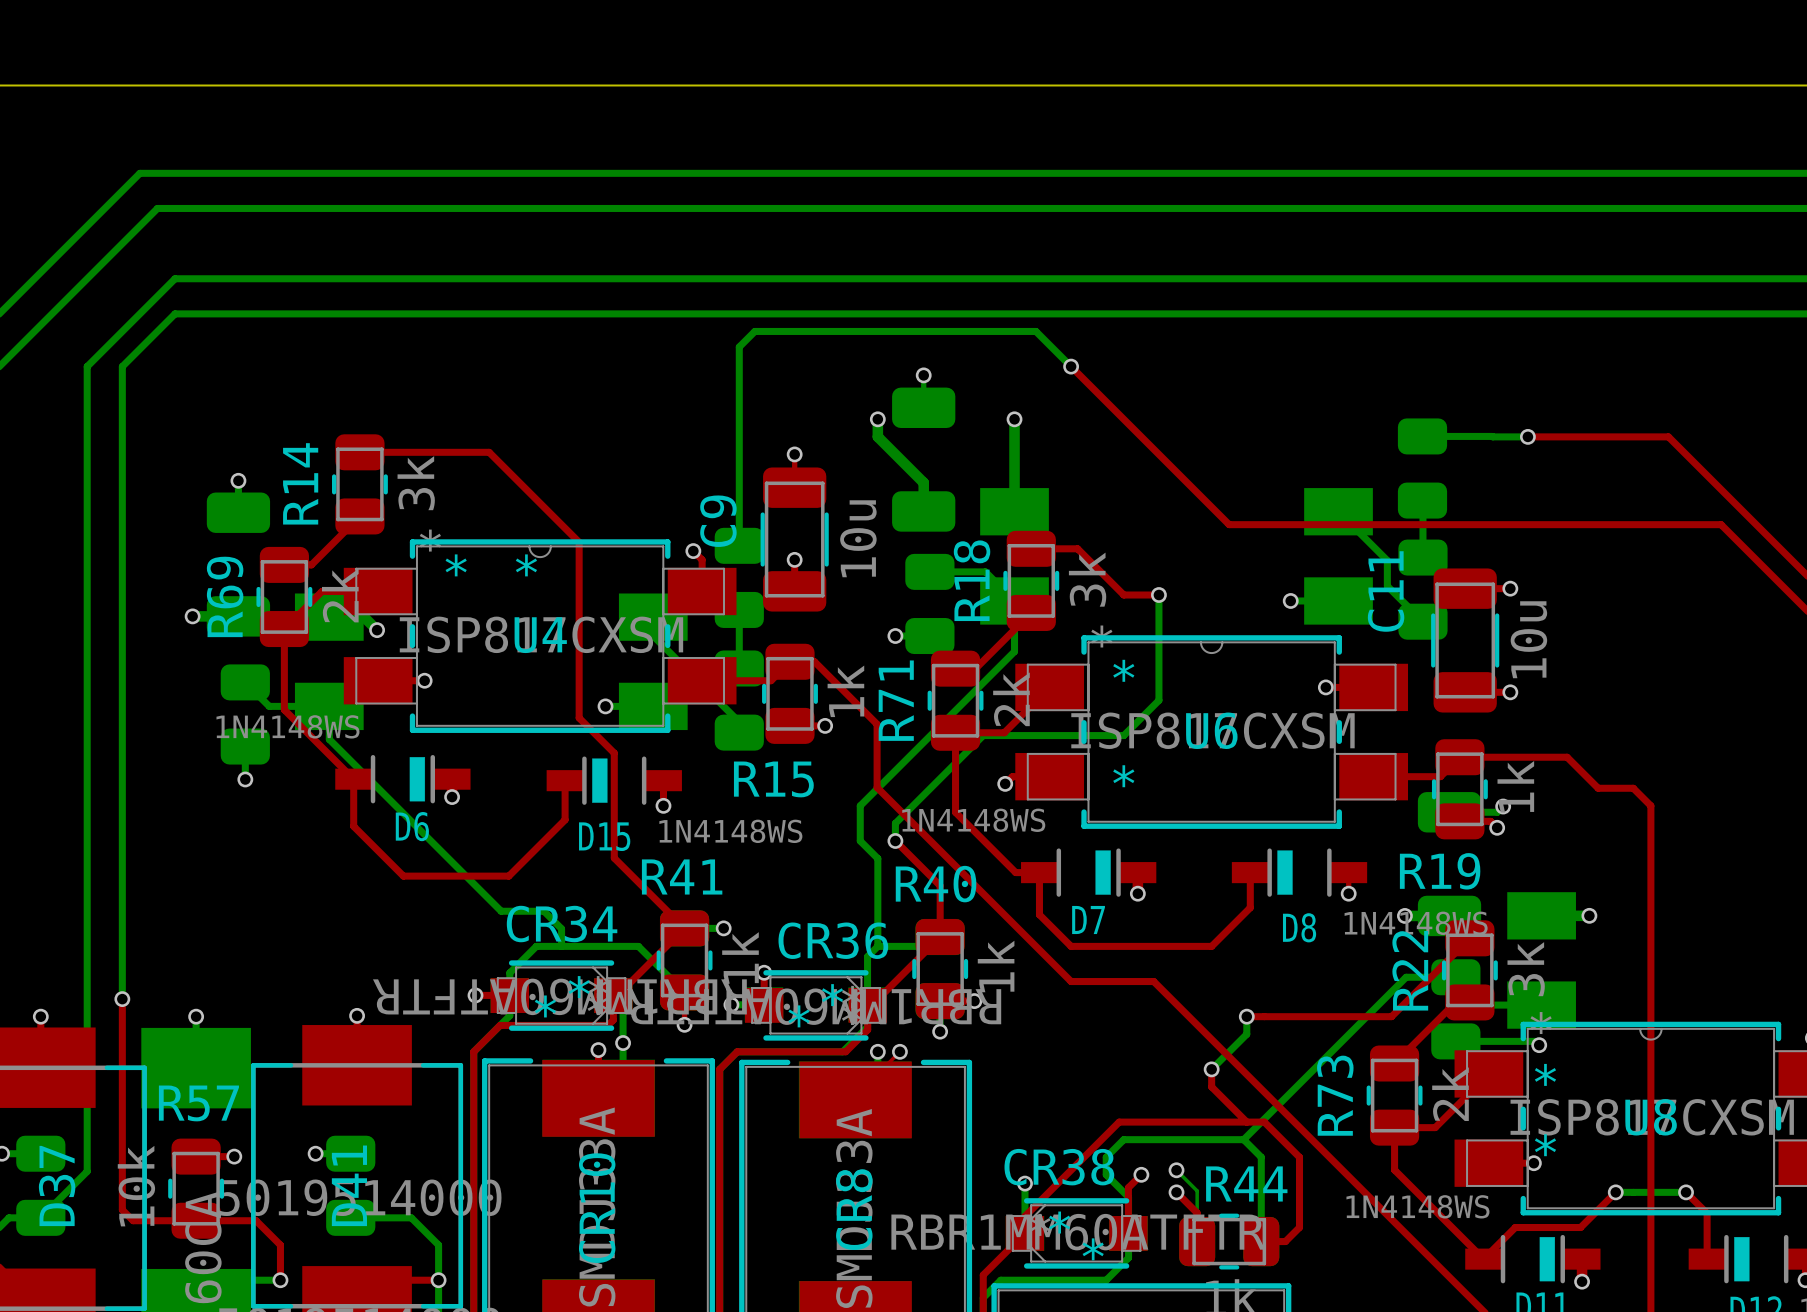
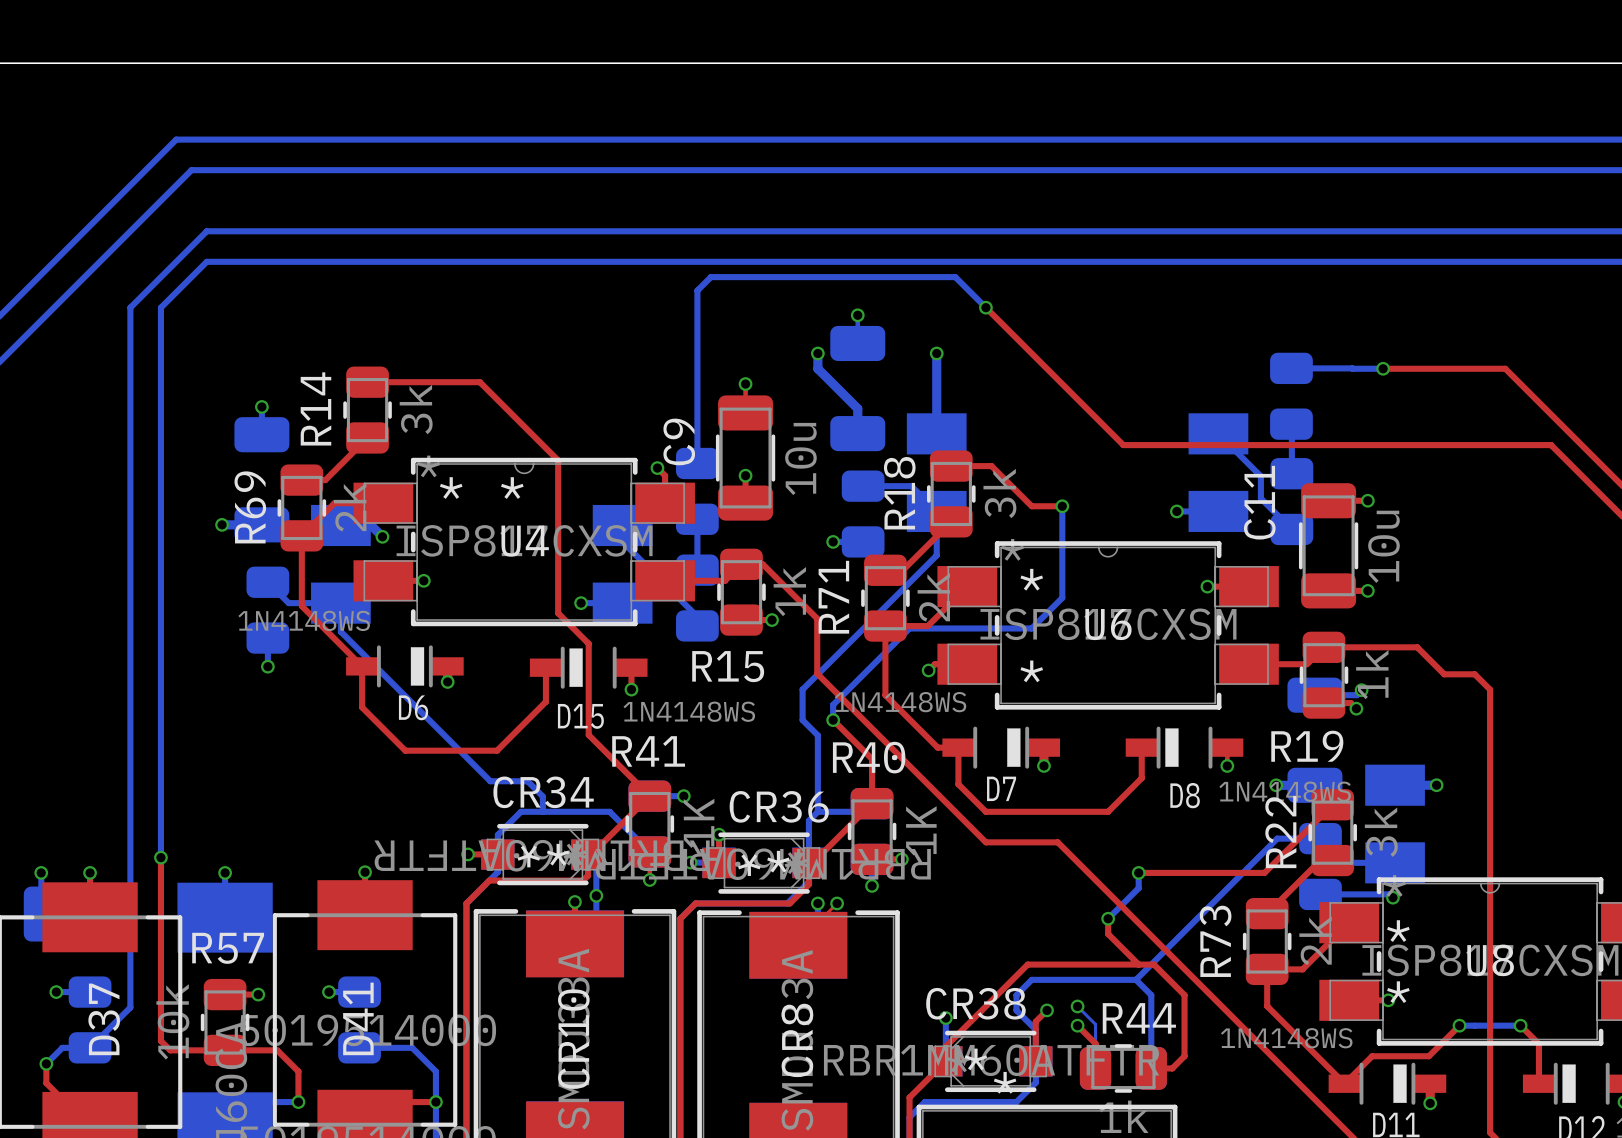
R41 value: 1k (740, 957) -> 1K (699, 823)
R40 value: 1k (996, 966) -> 1K (921, 830)

